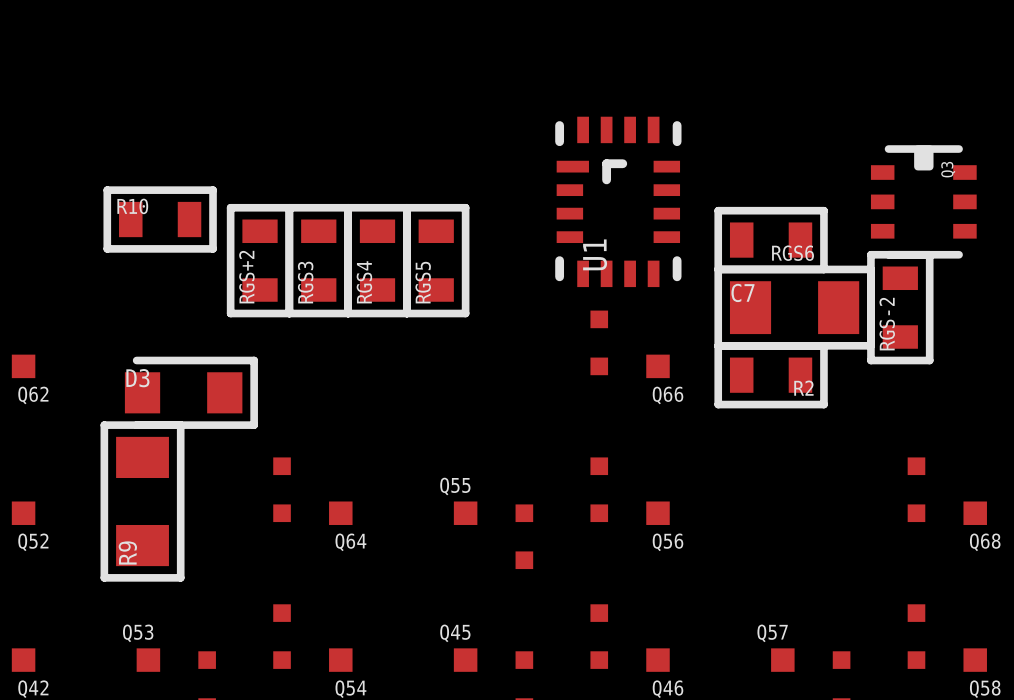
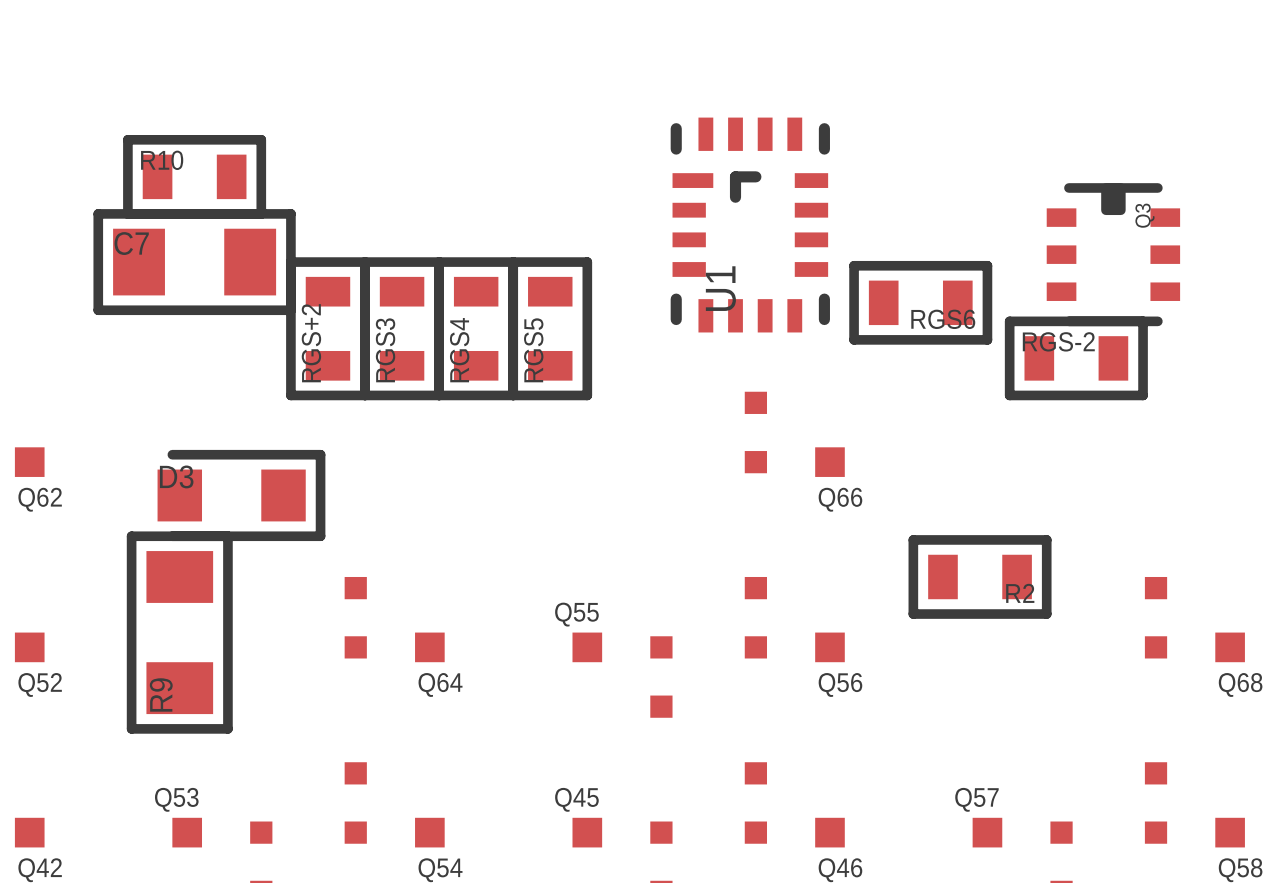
U1 position: (618, 201) -> (750, 225)
Q3 position: (923, 201) -> (1113, 254)
R10 position: (160, 219) -> (194, 176)
RGS6 position: (771, 240) -> (920, 302)
C7 position: (794, 307) -> (194, 262)
RGS-2 rotation: 0° (900, 307) -> 90° clockwise (1076, 358)
R2 position: (771, 375) -> (980, 576)

